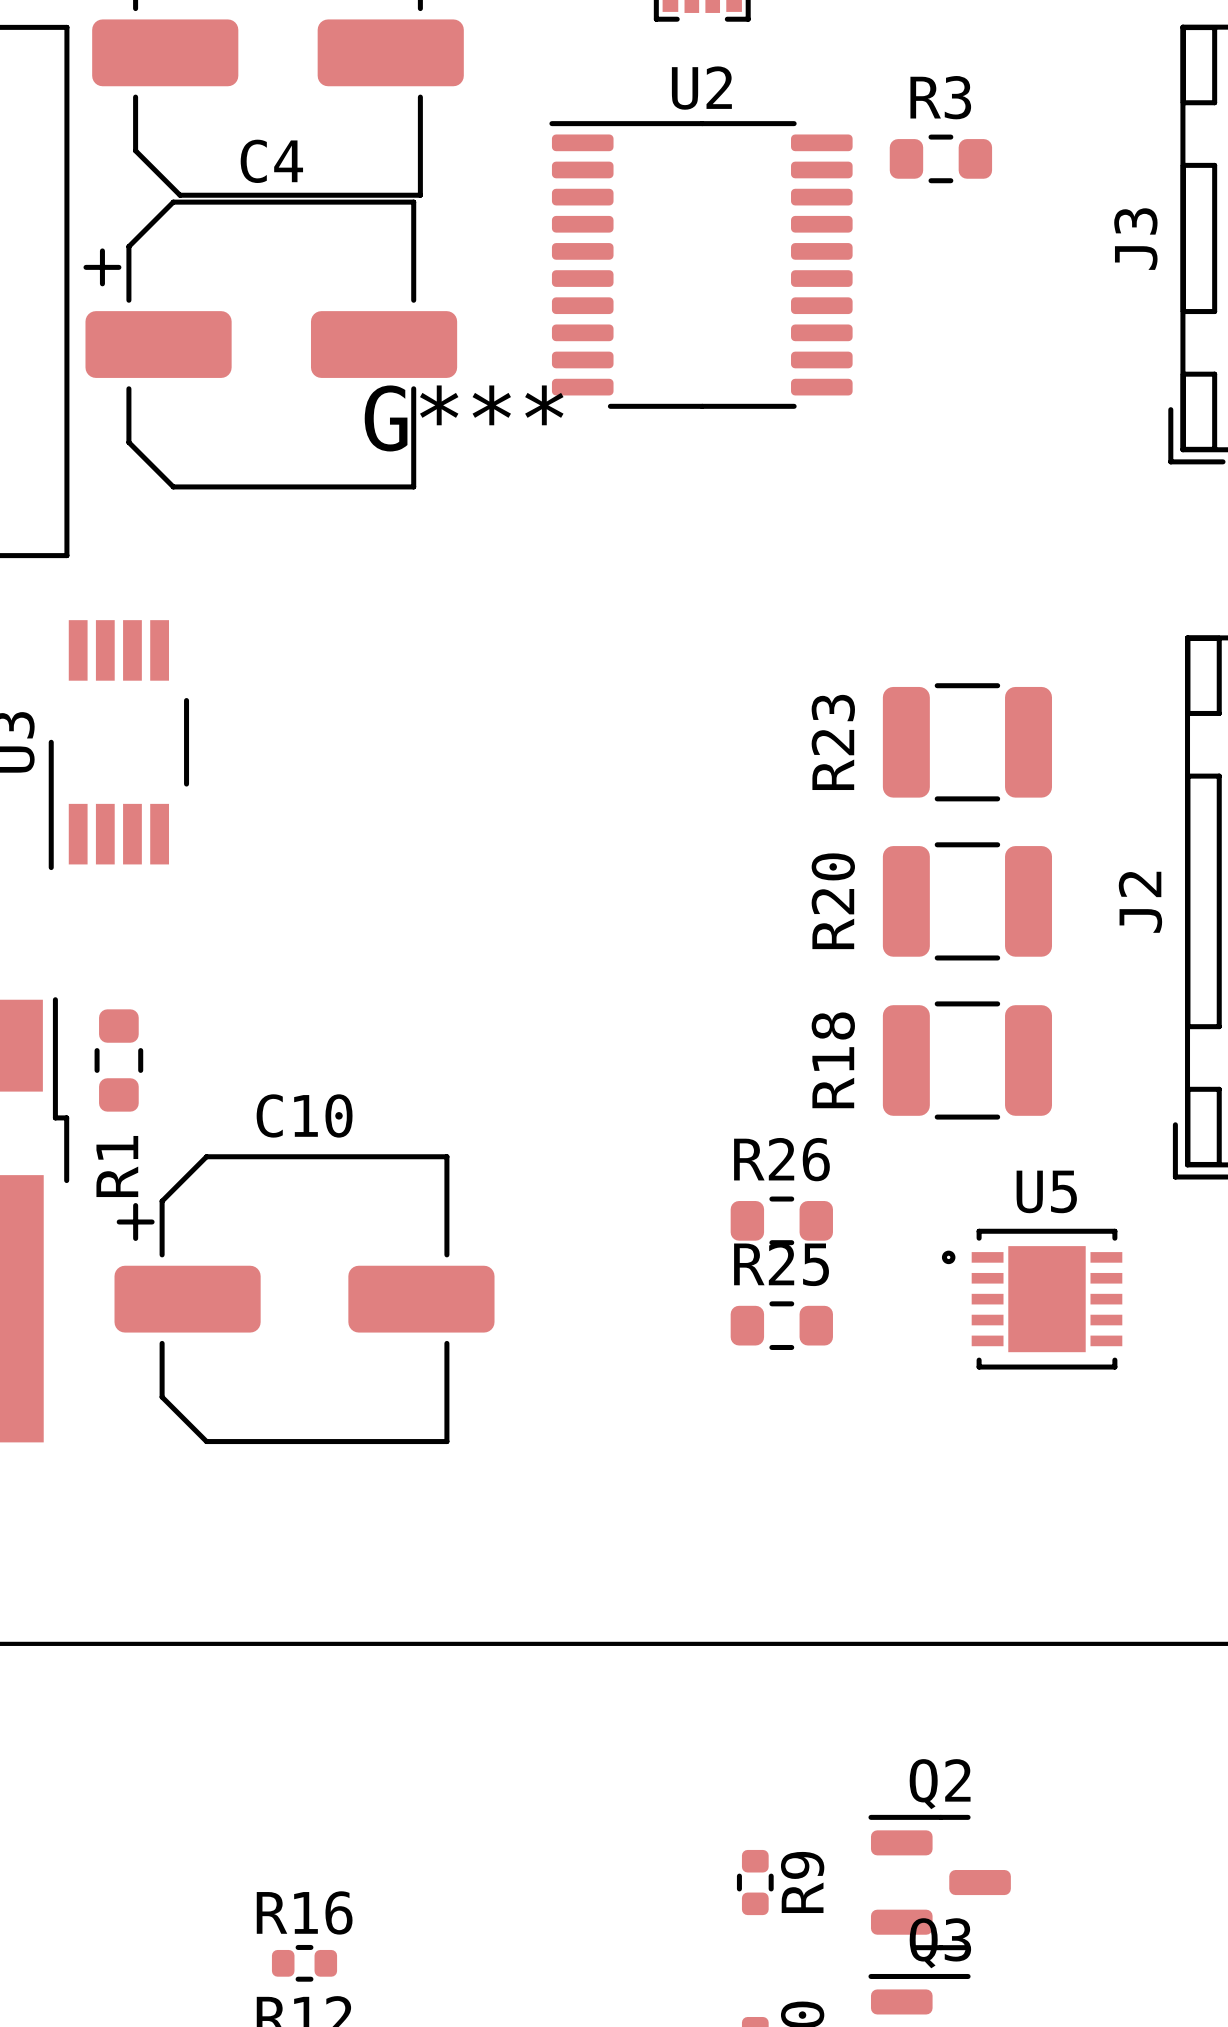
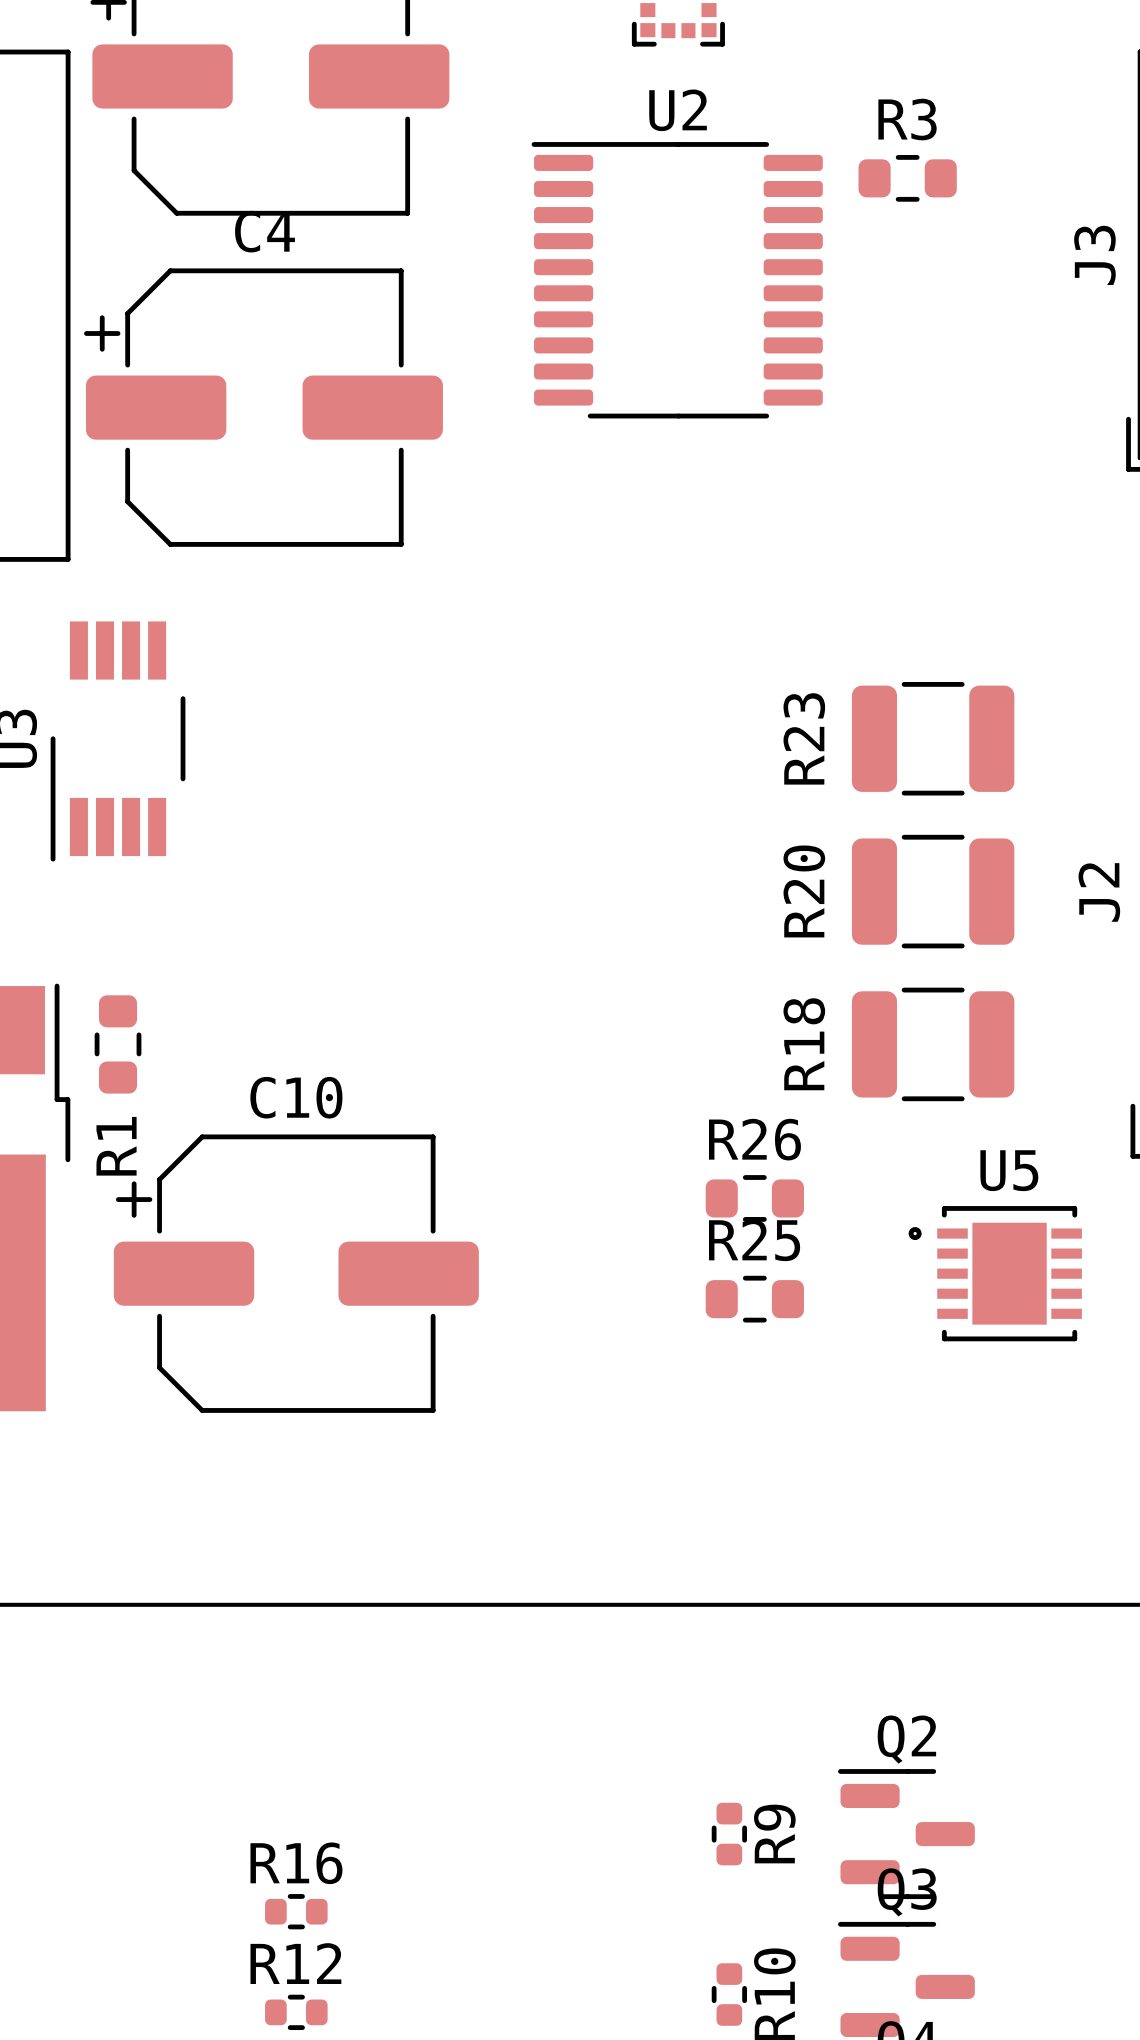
C4 position: (270, 344) -> (263, 407)
G***: (464, 418) -> none

